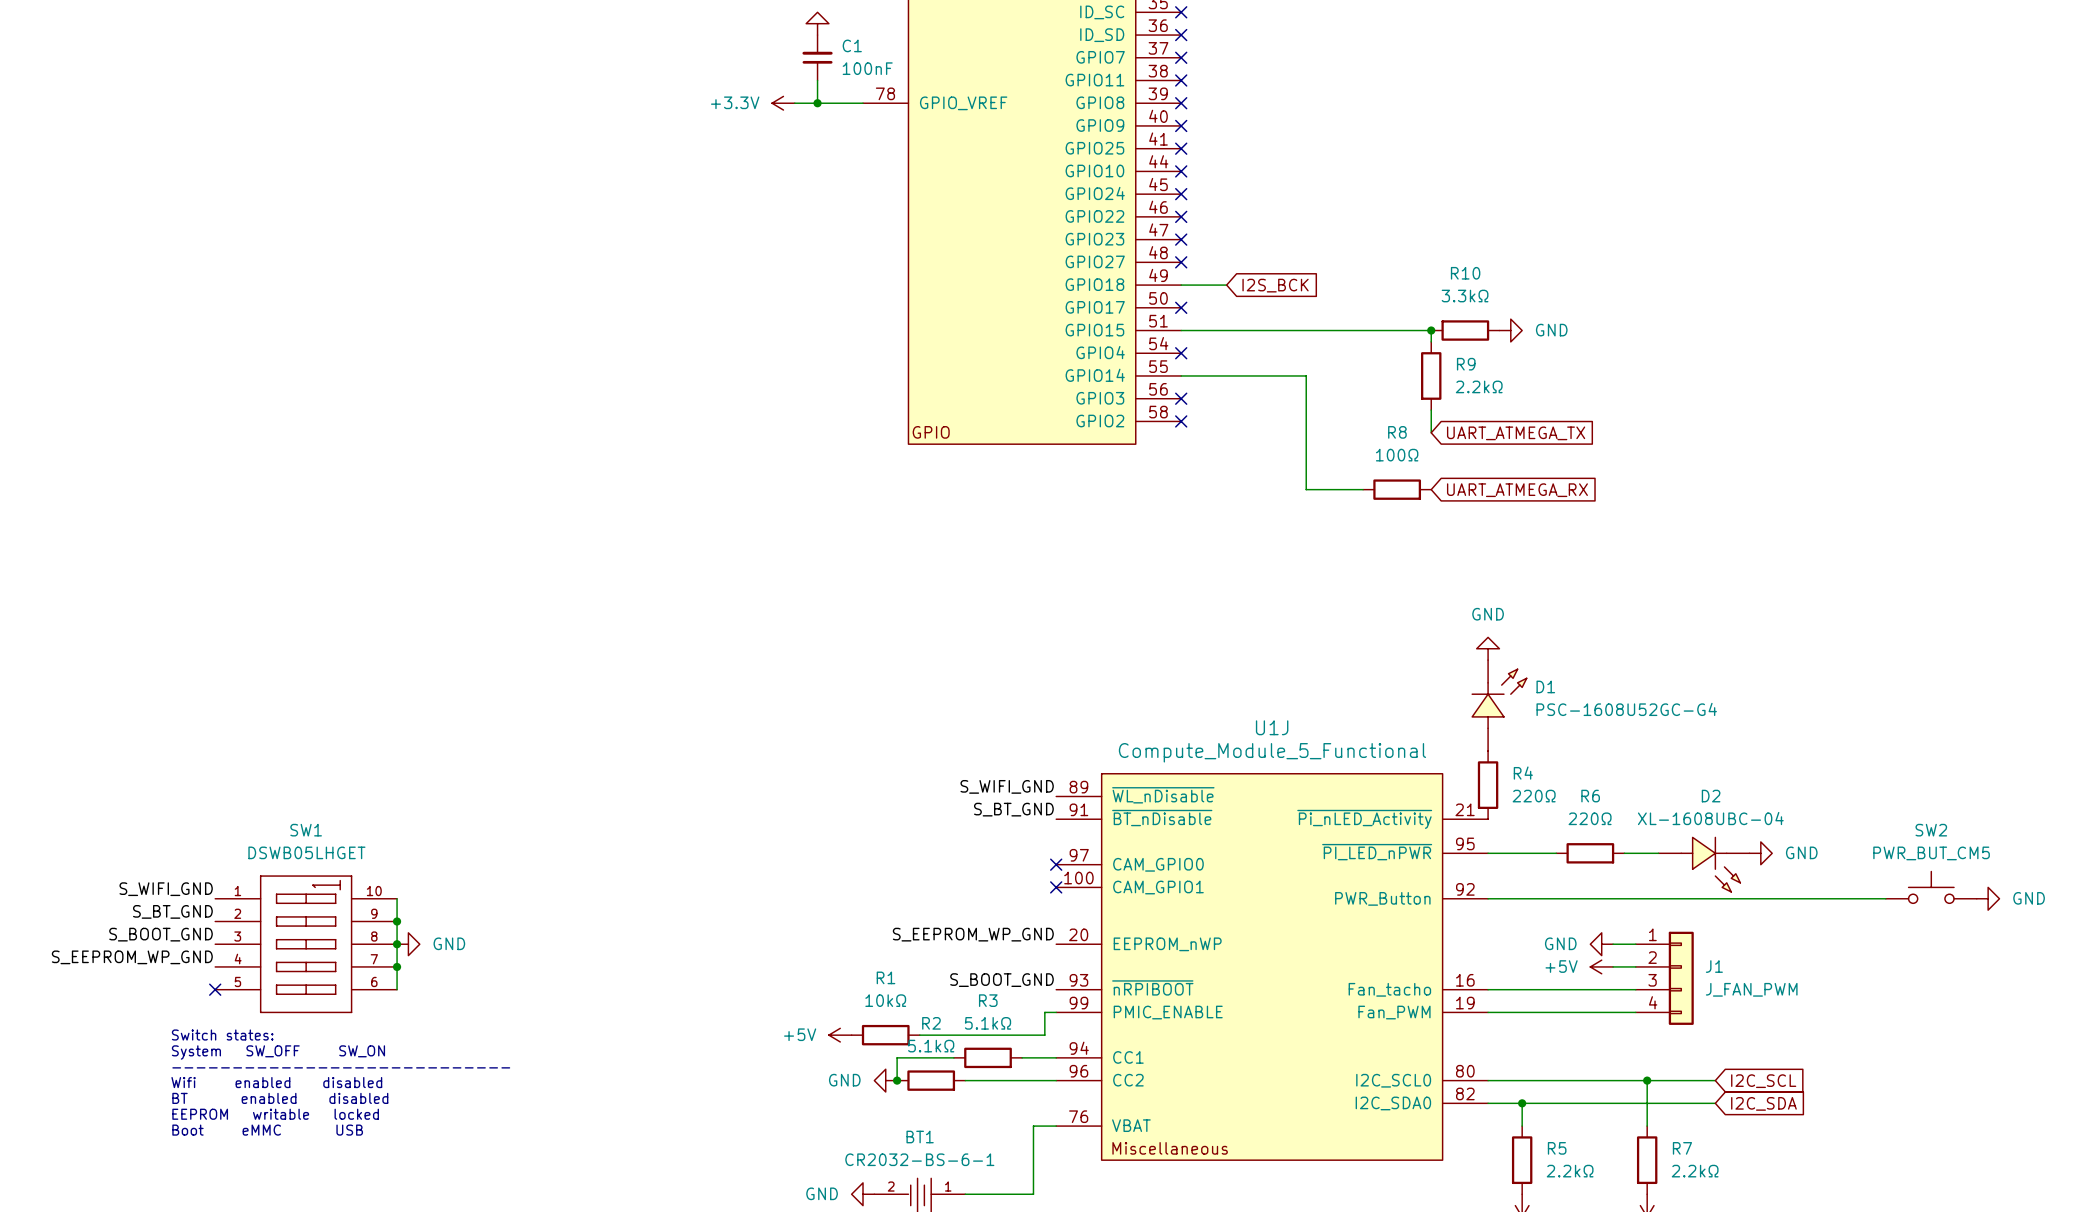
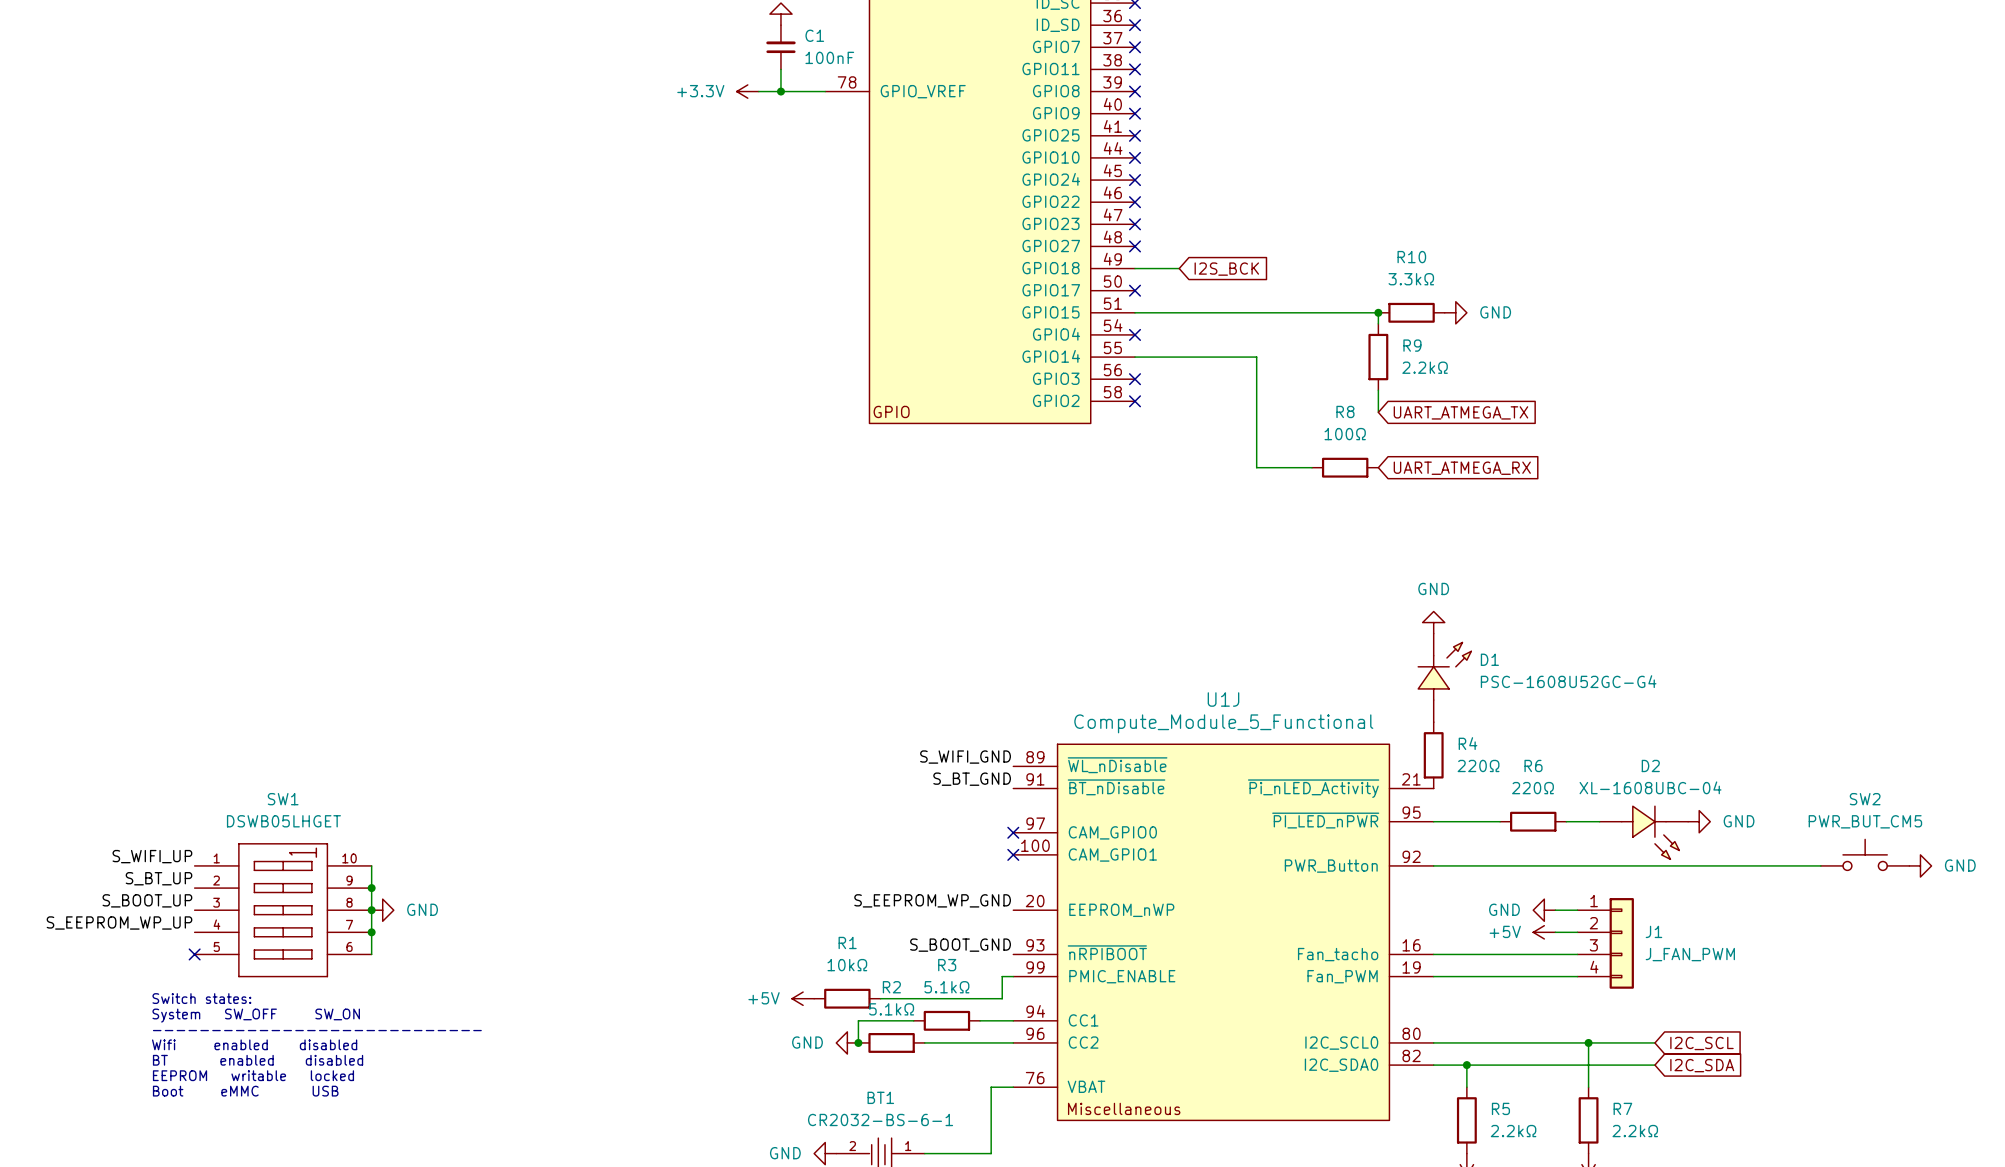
label: S_WIFI_GND (166, 889) -> S_WIFI_UP (152, 856)
label: S_BT_GND (172, 911) -> S_BT_UP (159, 878)
label: S_BOOT_GND (161, 934) -> S_BOOT_UP (147, 900)
label: S_EEPROM_WP_GND (132, 957) -> S_EEPROM_WP_UP (119, 922)

